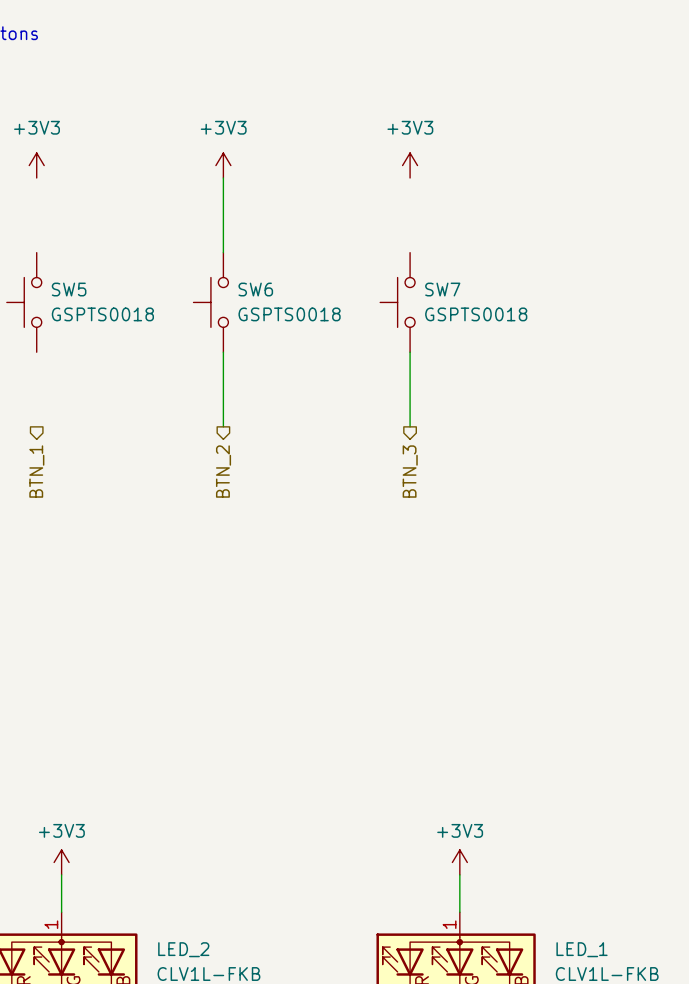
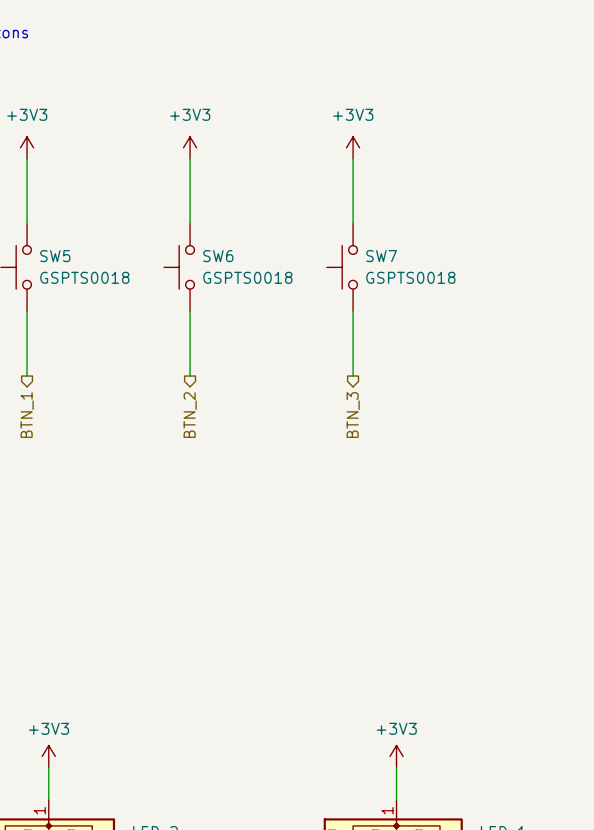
wire: none -> (27, 158) (27, 223)
wire: none -> (353, 158) (353, 223)
wire: none -> (27, 310) (27, 376)

